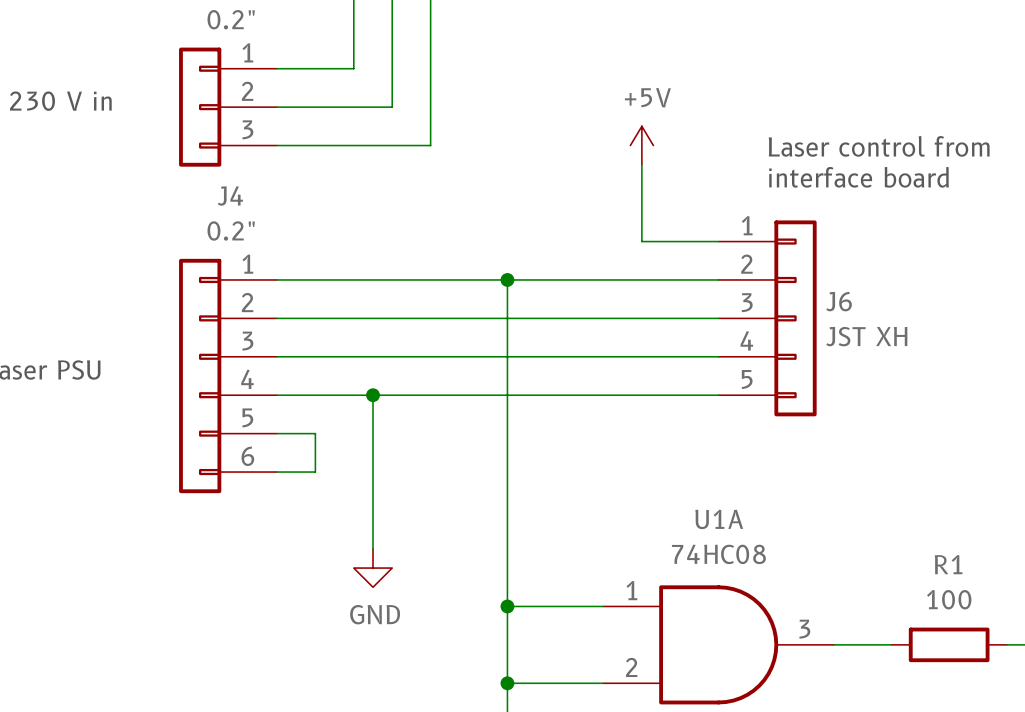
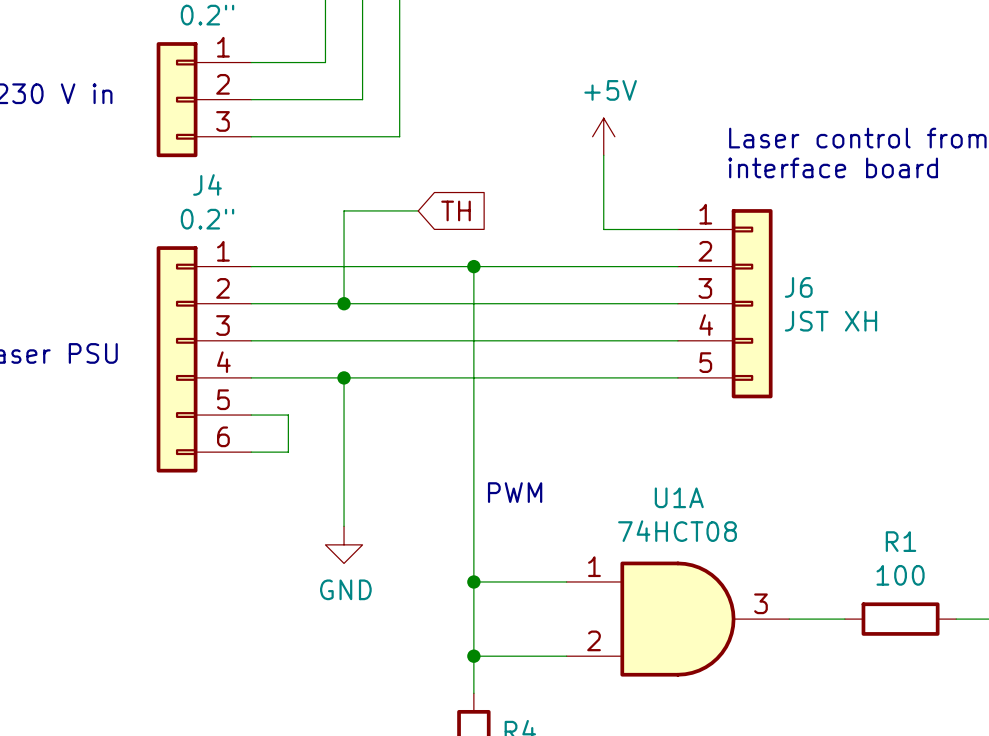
wire: none -> (418, 210) (344, 210) (344, 303)
global label: none -> TH (456, 210)
junction: none -> (344, 303)
text: none -> PWM (515, 492)
U1A value: 74HC08 (718, 554) -> 74HCT08 (677, 531)

